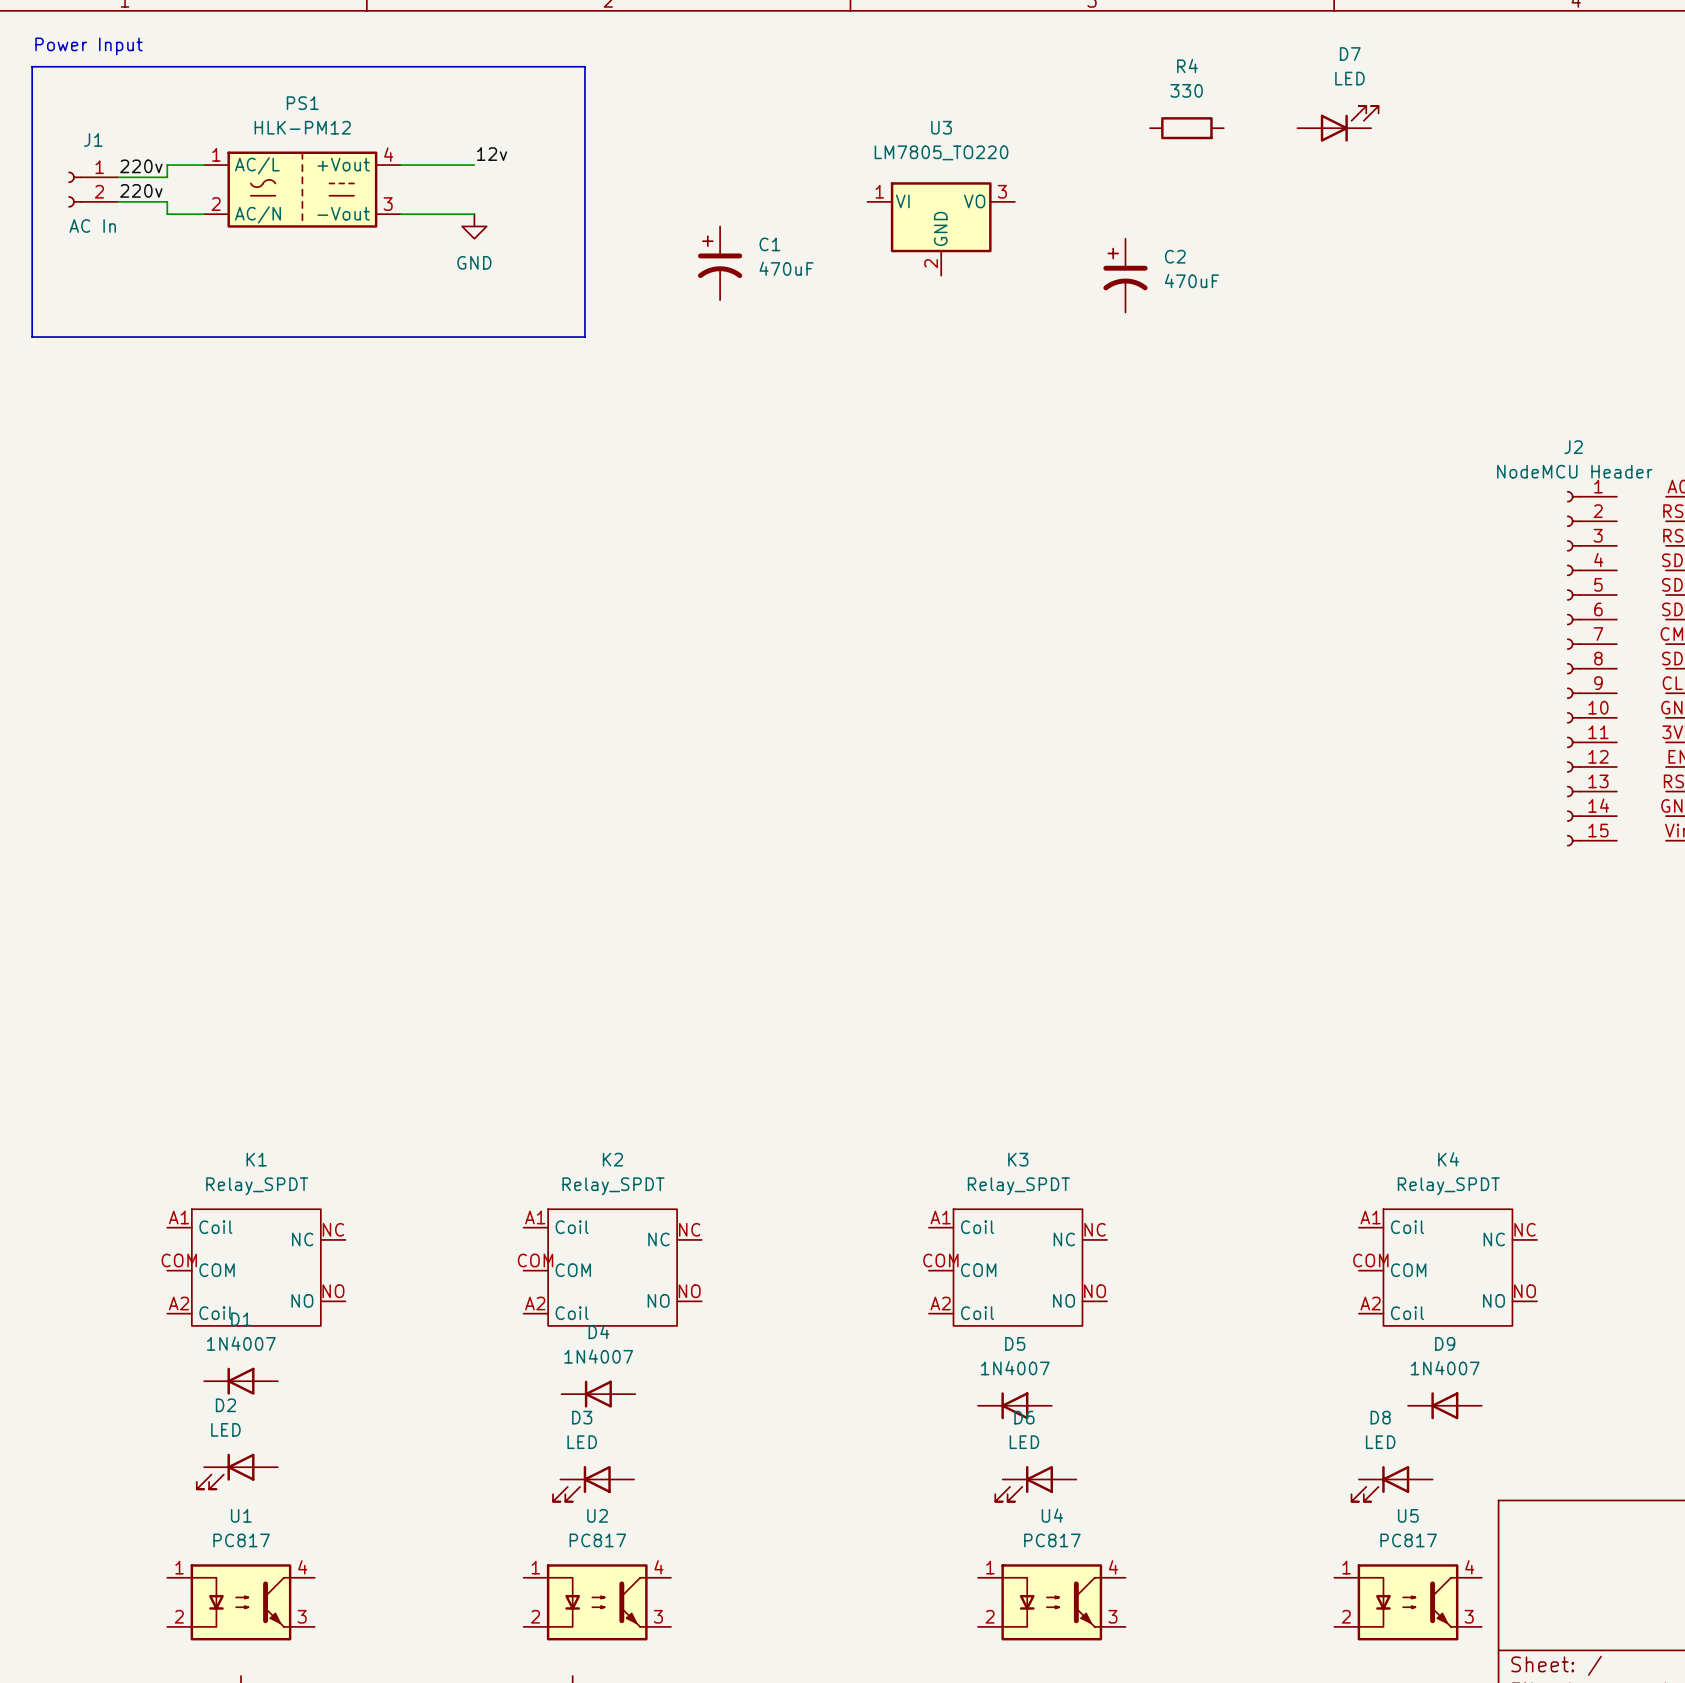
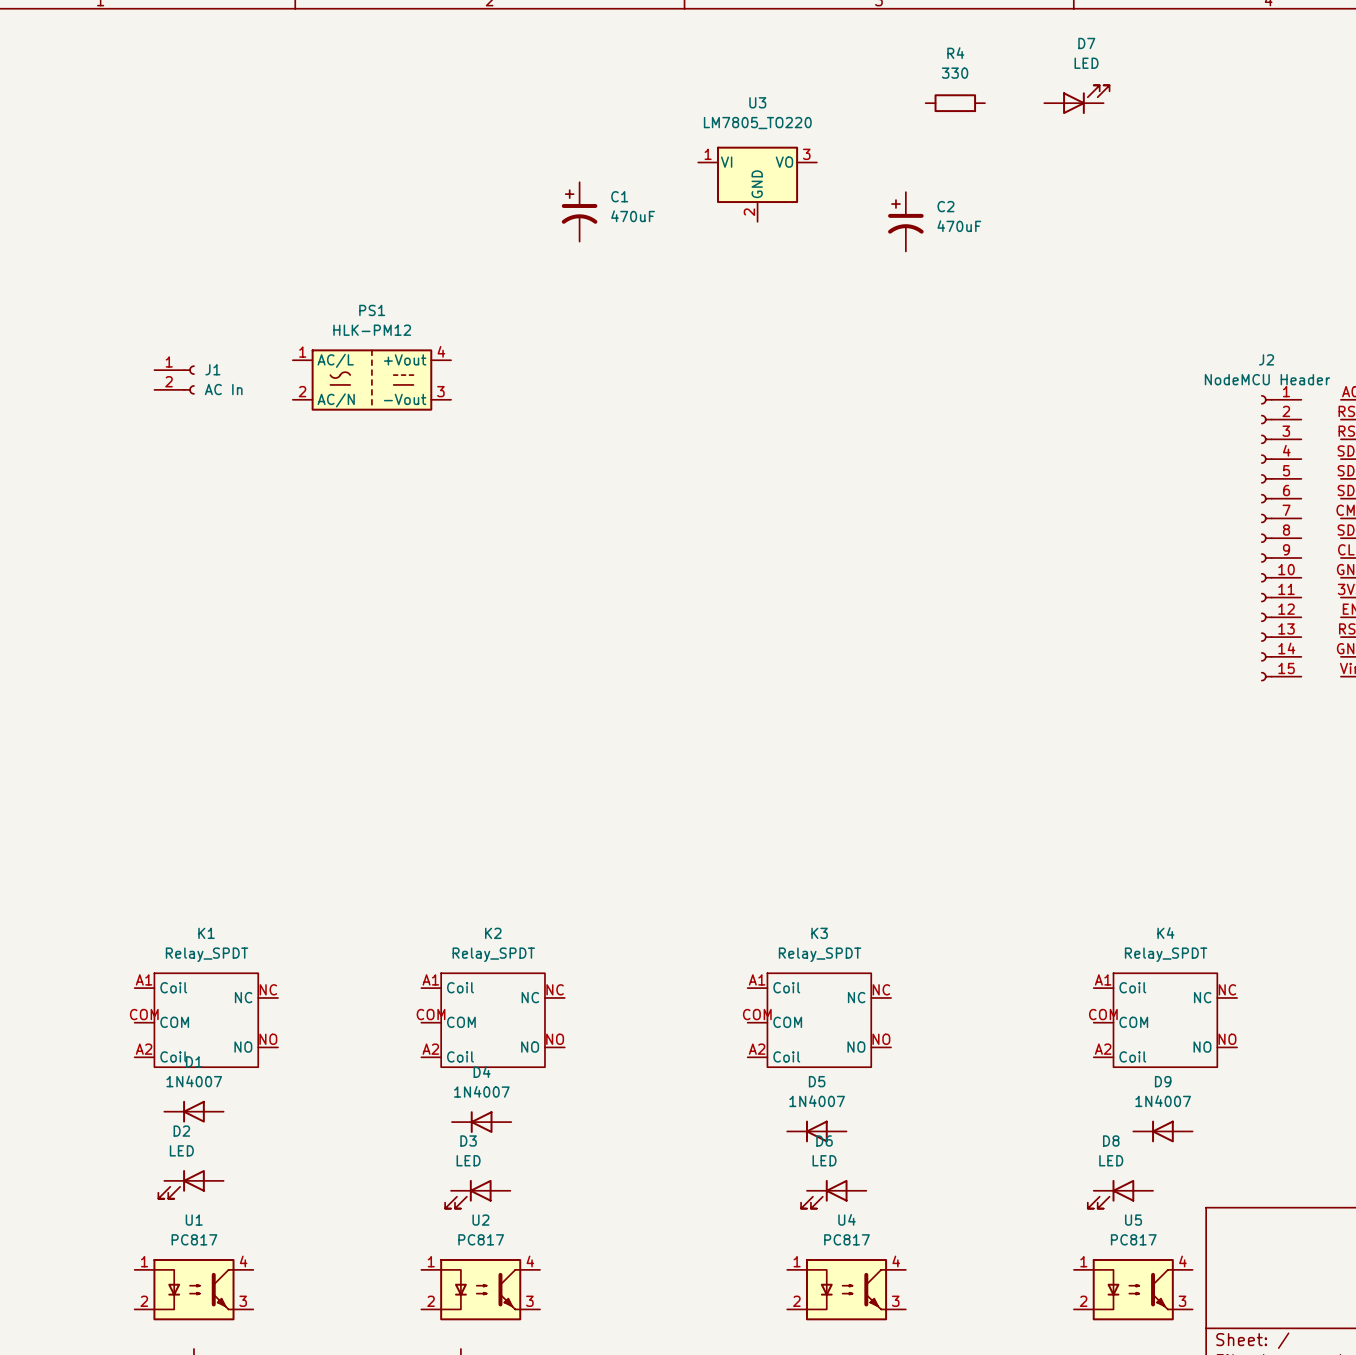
text: Power Input (88, 46) -> none
line: (32, 66) (584, 66) (584, 337) (32, 337) (32, 66) -> none
J1 name position: J1 (93, 140) -> J1 (212, 369)
label: 12v (492, 154) -> none
wire: (204, 165) (167, 165) (167, 177) (118, 177) -> none
wire: (400, 165) (474, 165) -> none
label: 220v (141, 166) -> none
J1 flip: as is (75, 189) -> left-right (189, 380)
J1 position: (93, 189) -> (174, 380)
PS1 position: (302, 189) -> (371, 380)
label: 220v (141, 190) -> none
wire: (118, 201) (167, 201) (167, 214) (204, 214) -> none
wire: (400, 214) (474, 214) -> none
J1 value position: AC In (92, 226) -> AC In (223, 389)
power symbol: GND (474, 226) -> none

